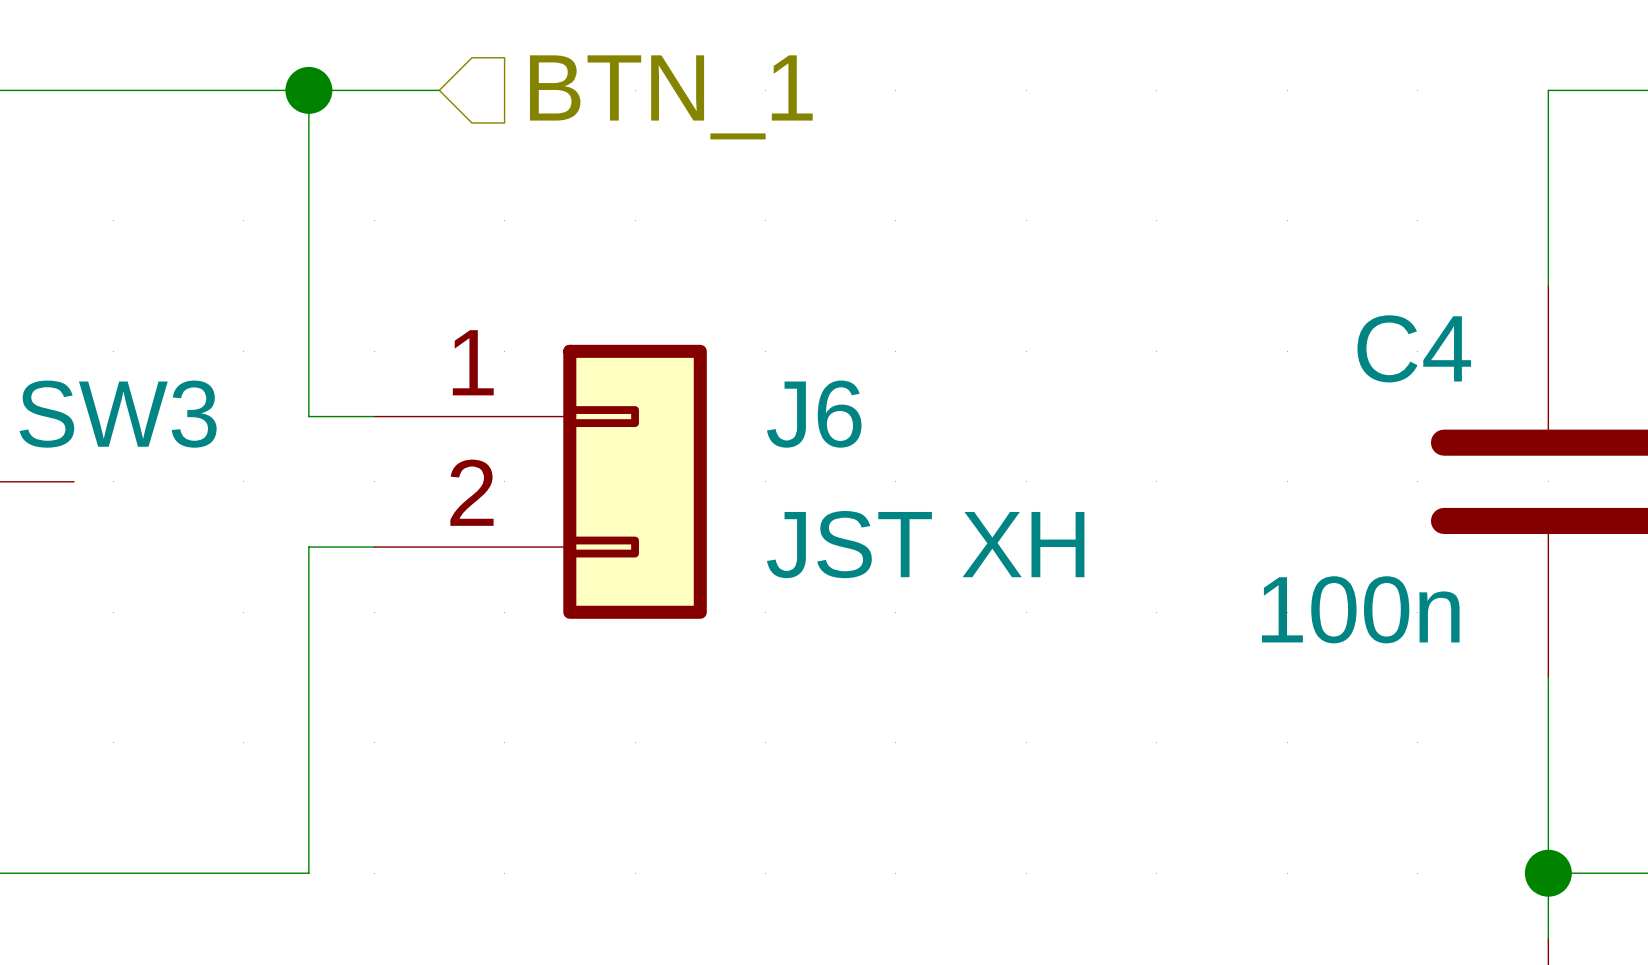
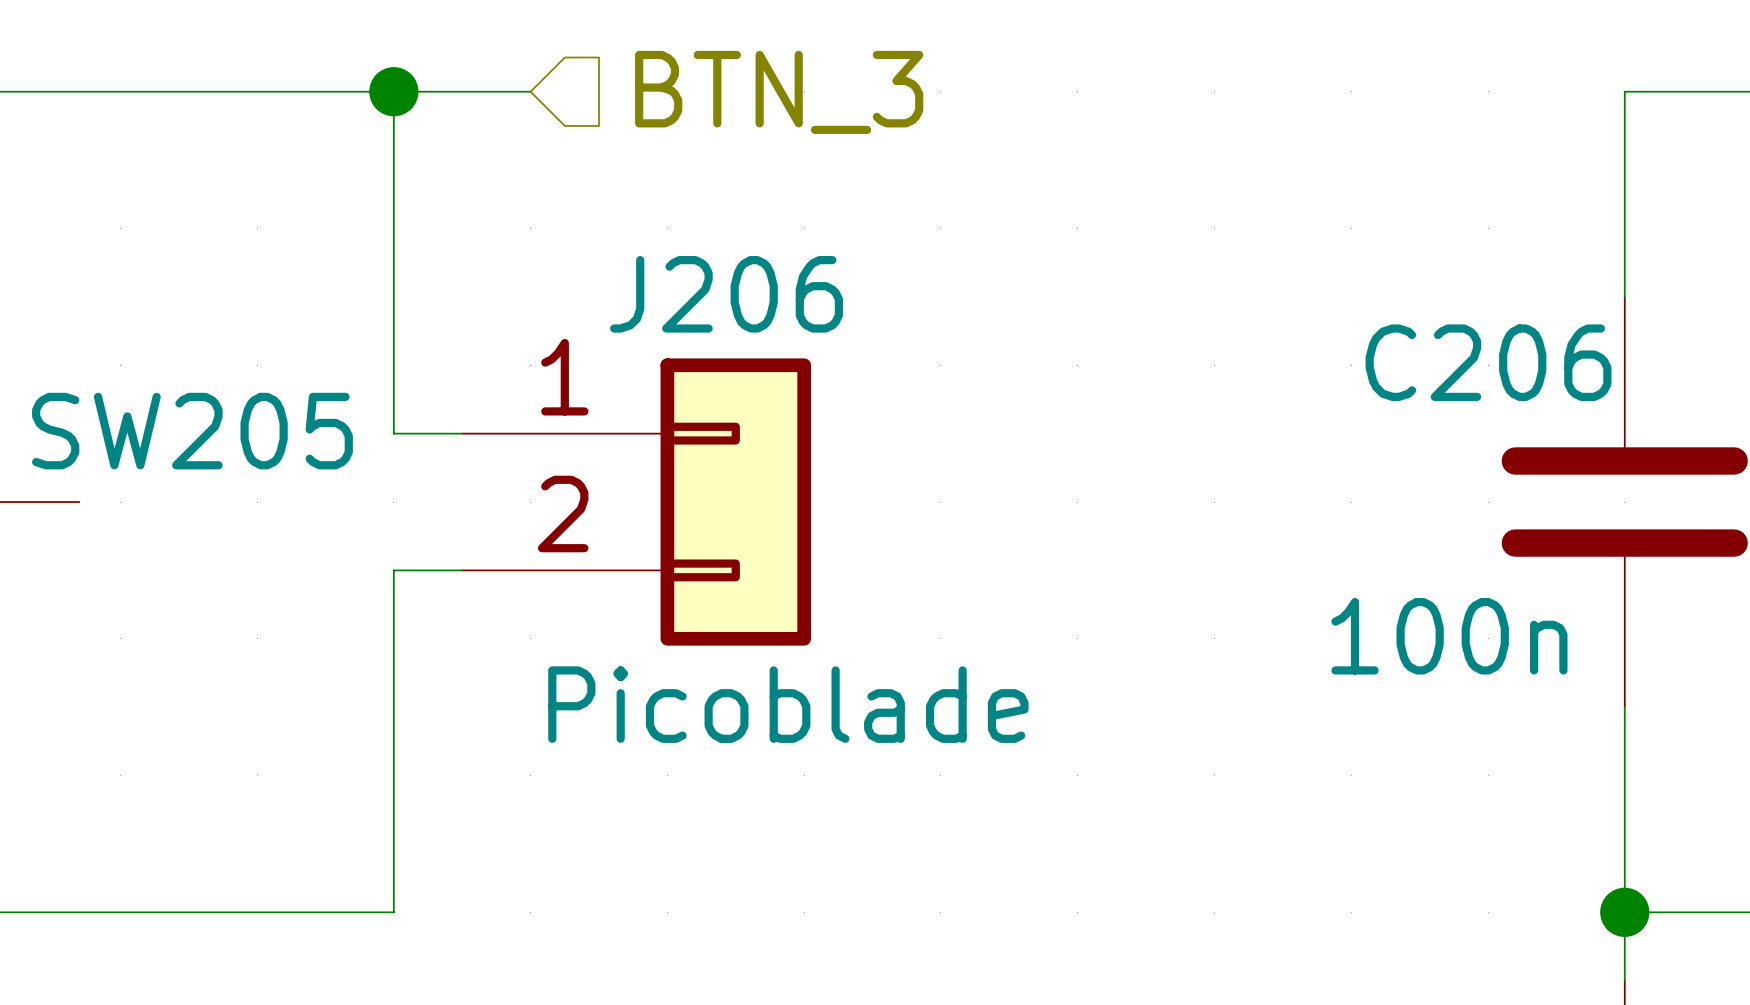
wire: (308, 90) (308, 416) (374, 416) -> (393, 91) (393, 433) (462, 433)
junction position: (308, 90) -> (393, 91)
wire: none -> (462, 91) (530, 91)
hierarchical label: BTN_1 (671, 97) -> BTN_3 (779, 92)
C4 name: C4 (1414, 348) -> C206 (1488, 362)
SW3 name: SW3 (118, 414) -> SW205 (192, 431)
J6: JST XH (540, 481) -> none
J206: none -> Picoblade (636, 502)
wire: (374, 547) (308, 547) (308, 873) -> (462, 570) (393, 570) (393, 912) (325, 912)

